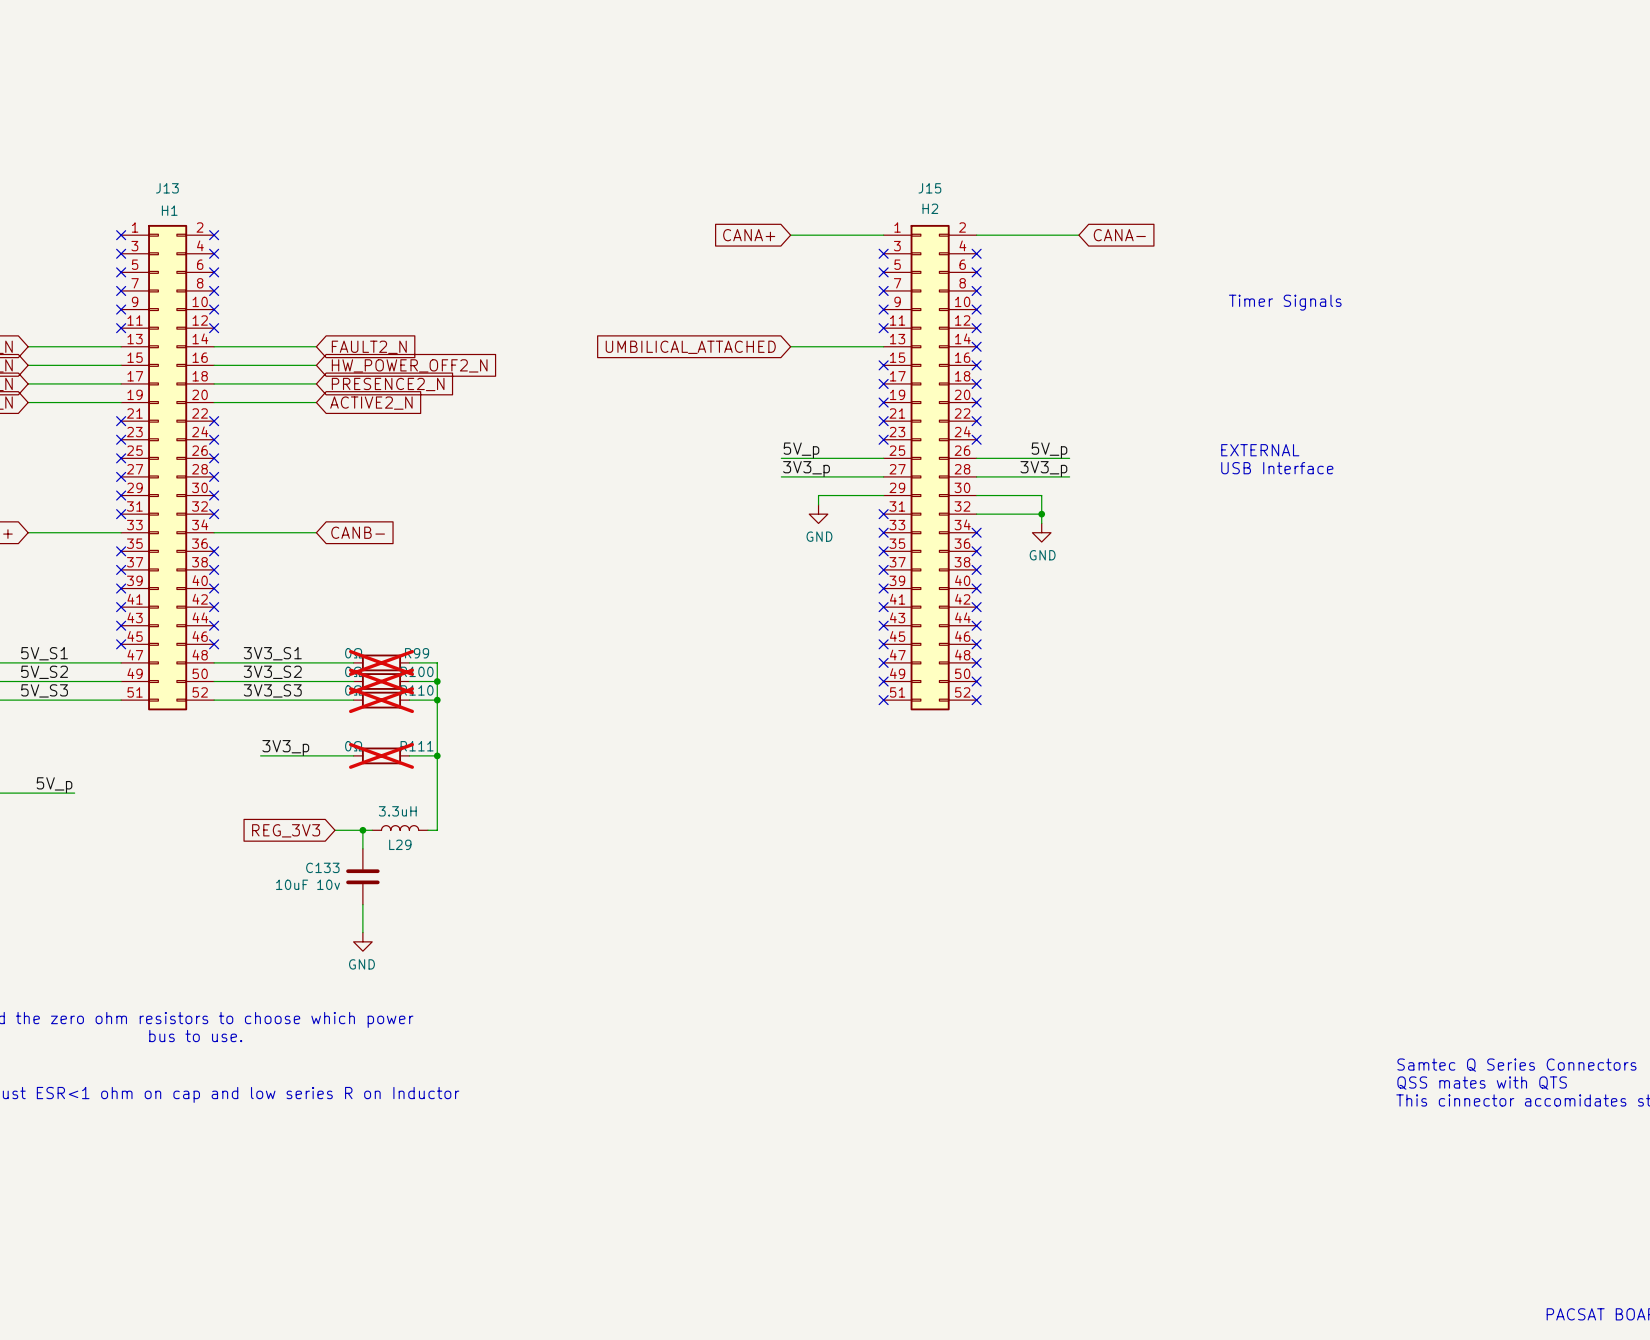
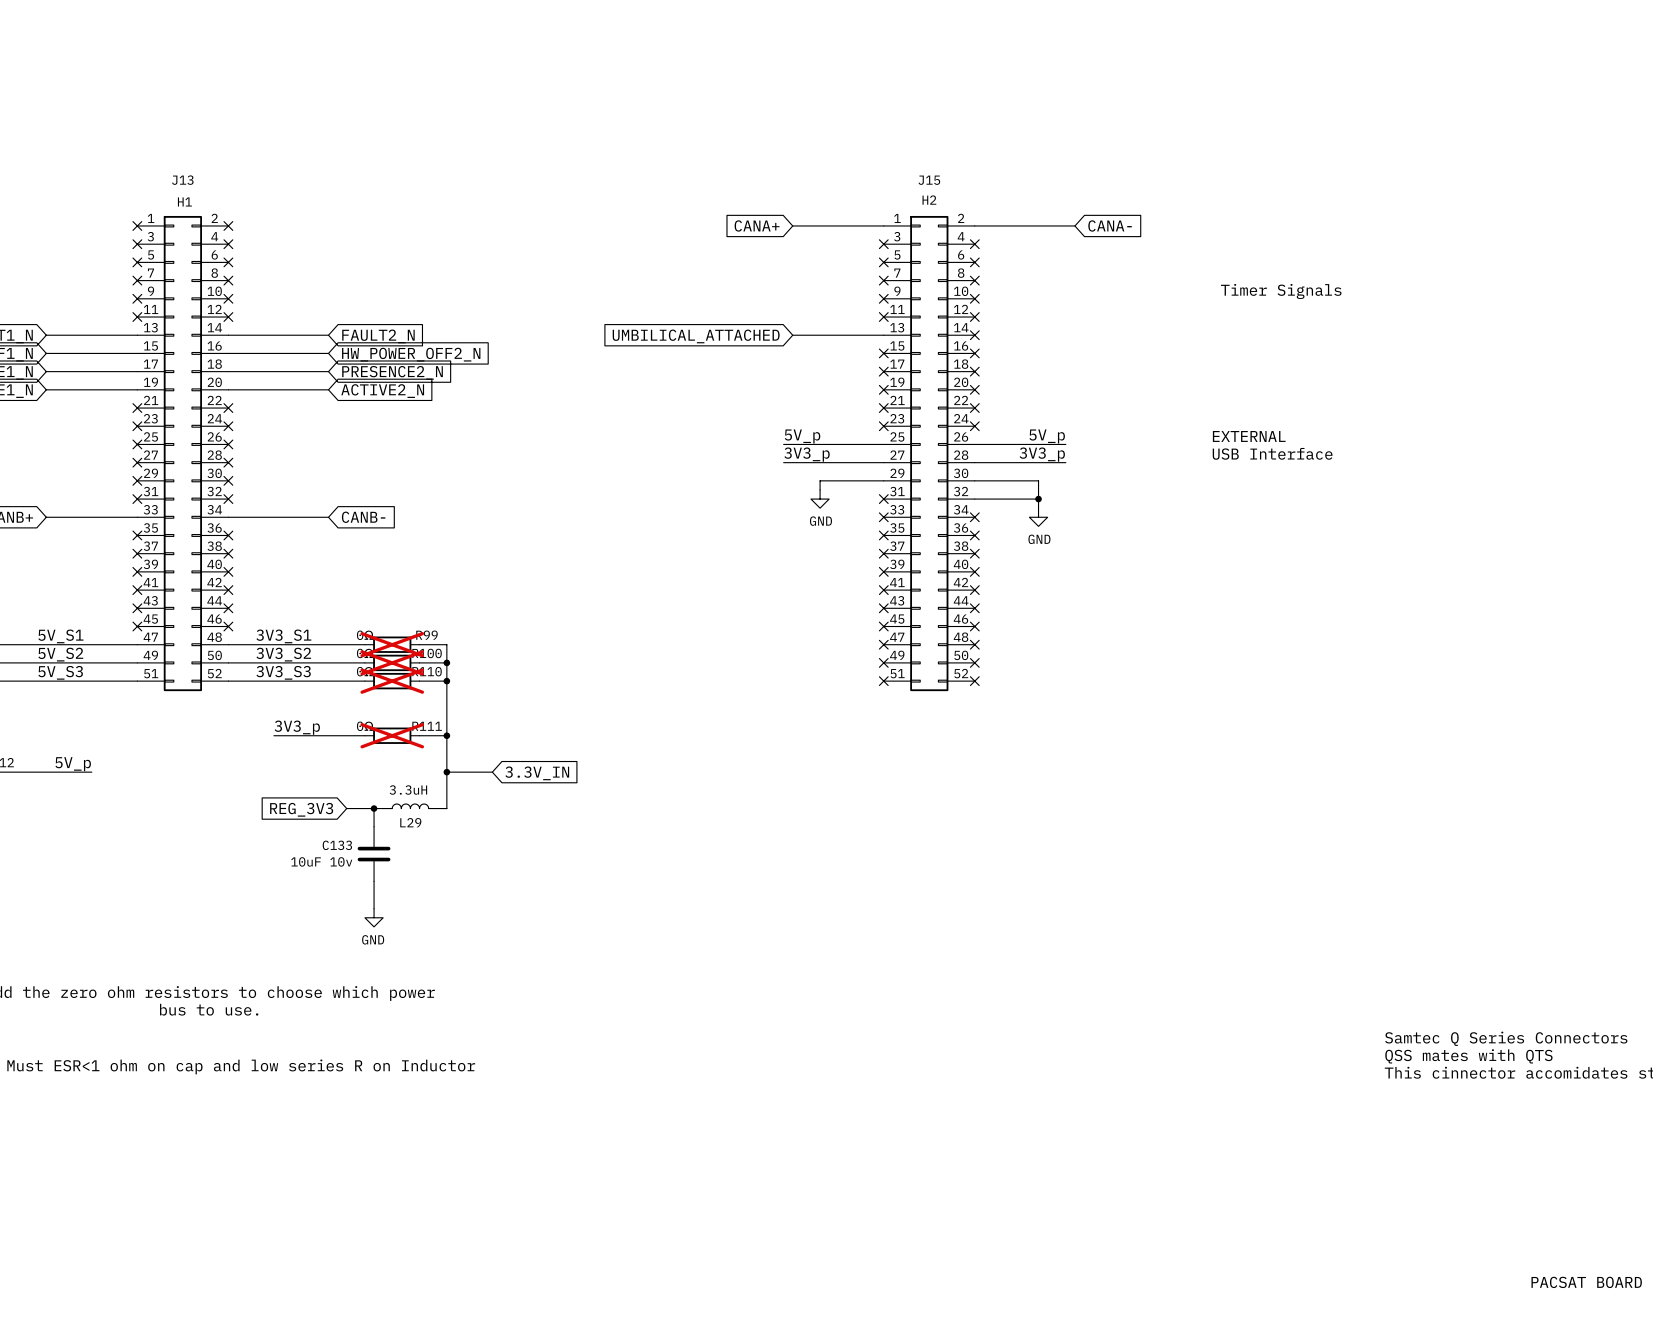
wire: none -> (446, 772) (492, 772)
junction: none -> (446, 772)
global label: none -> 3.3V_IN (537, 773)

